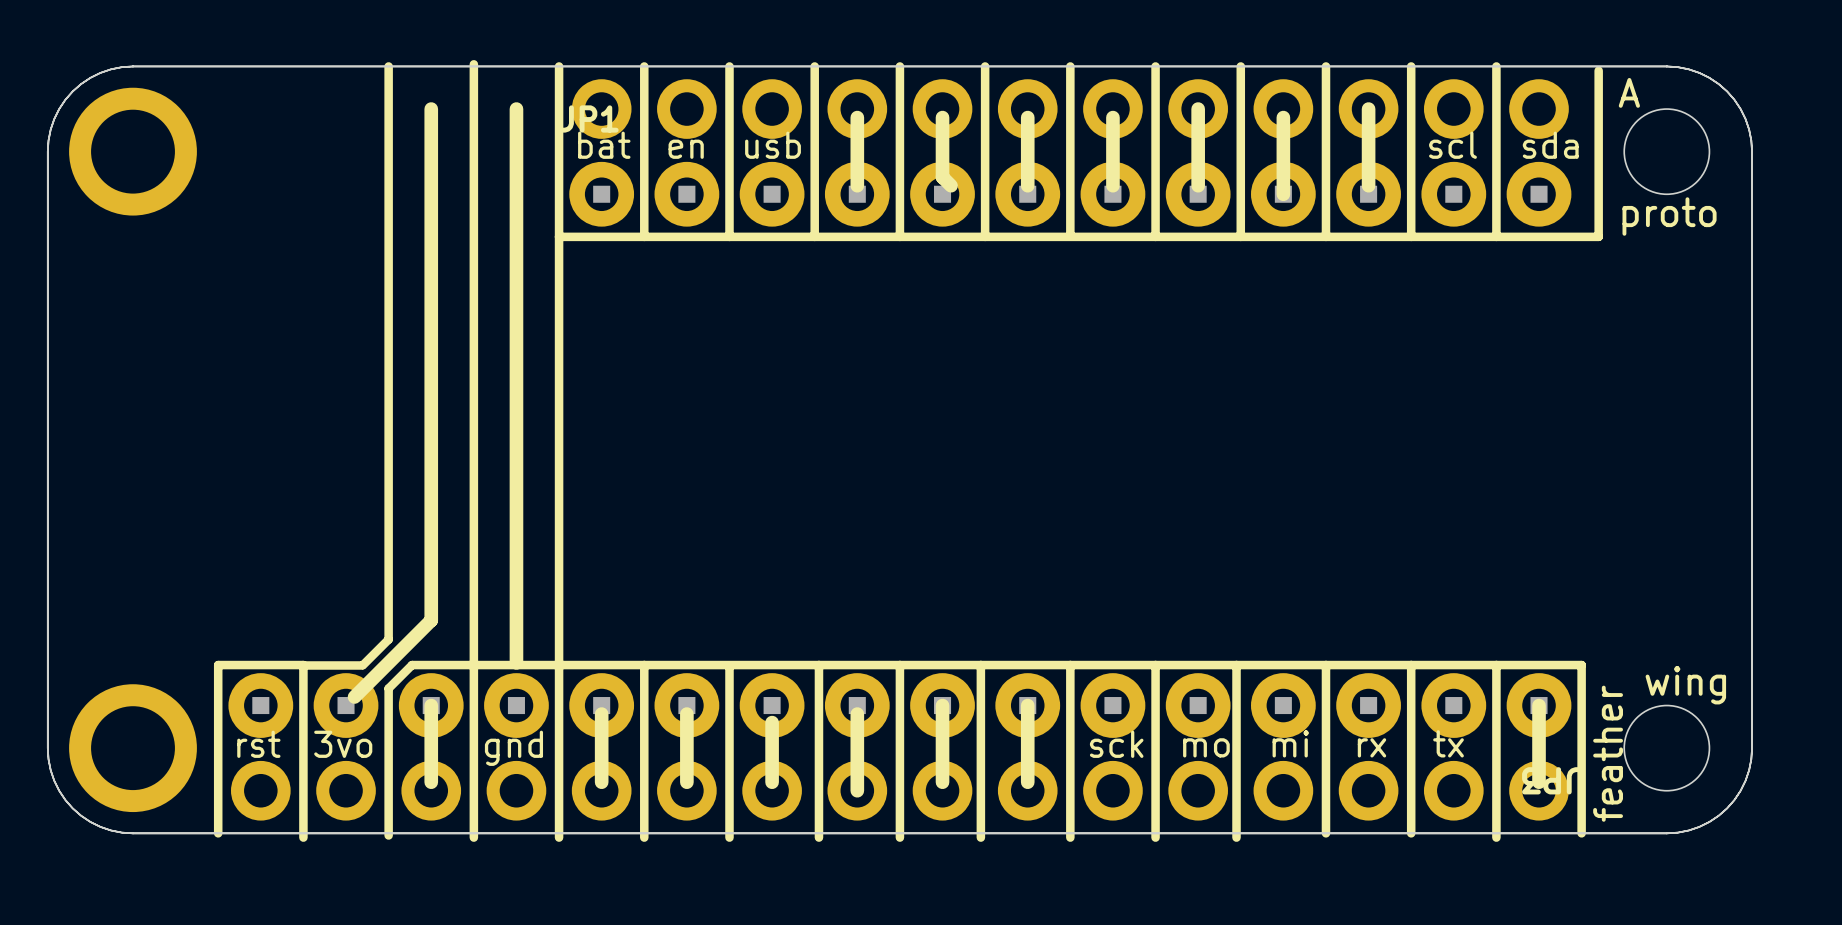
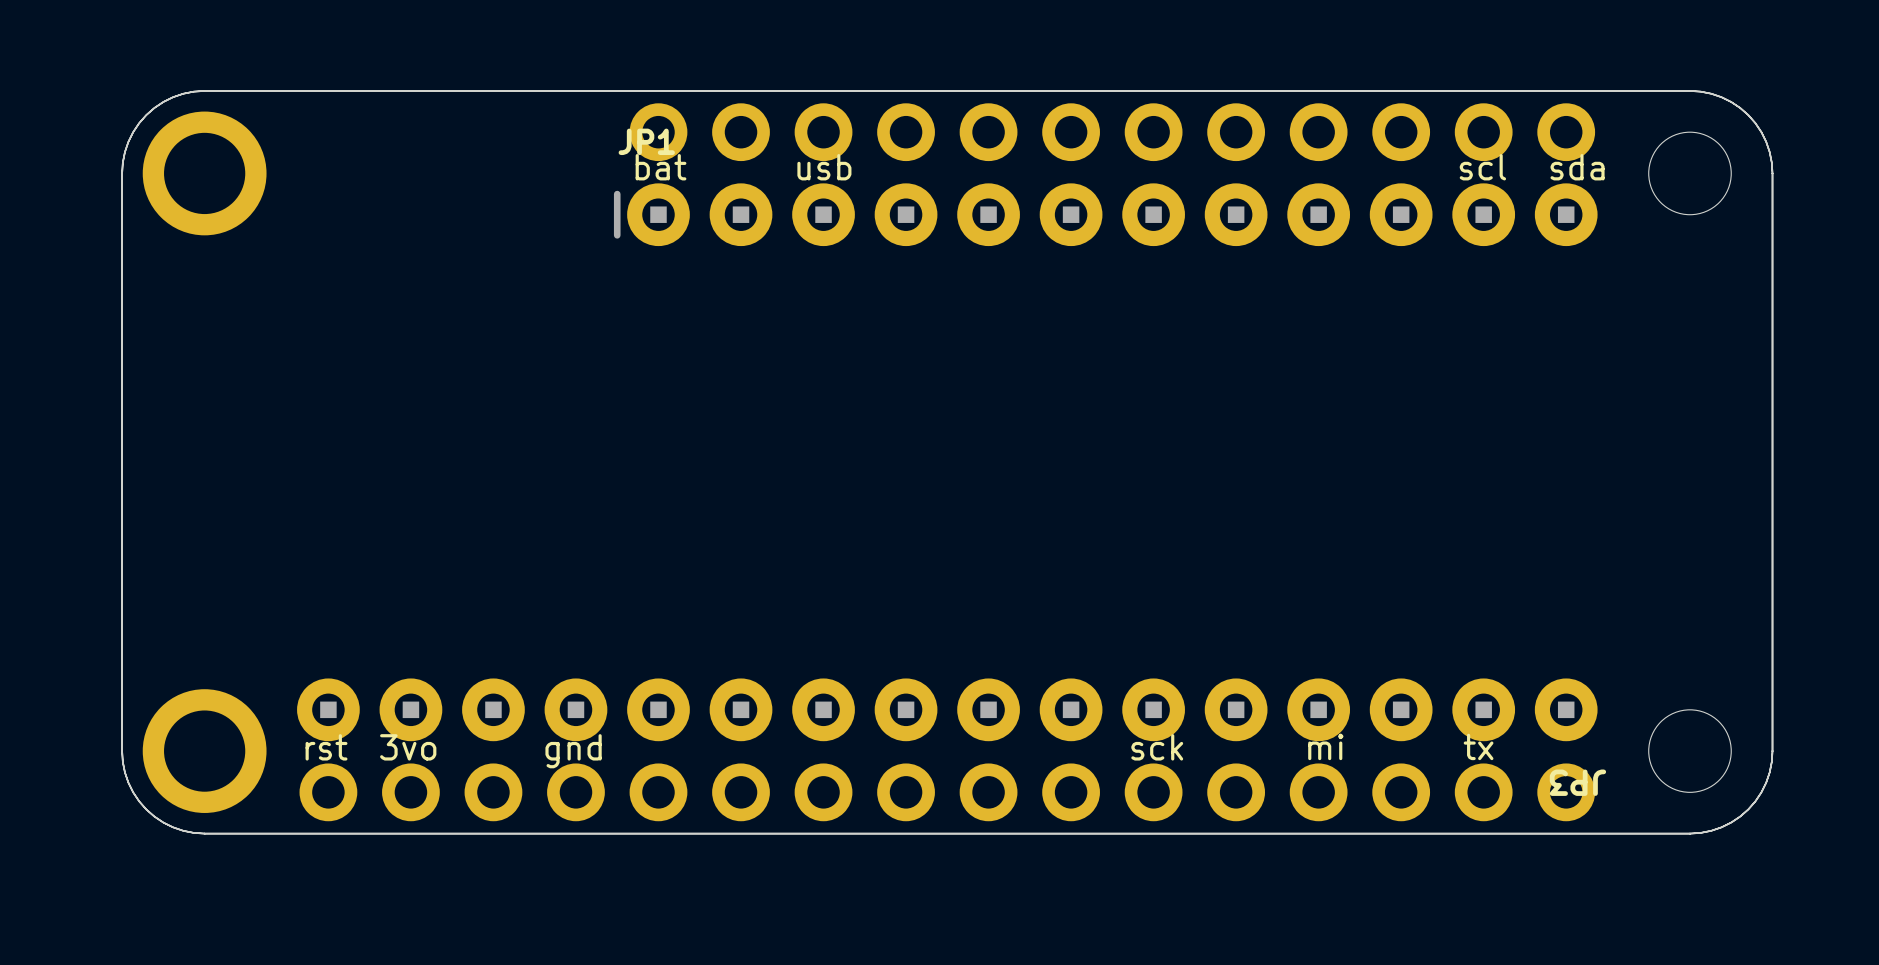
line: (473, 64) (473, 837) -> none
line: (388, 66) (388, 639) (363, 665) -> none
line: (559, 66) (559, 837) -> none
line: (644, 66) (644, 236) -> none
line: (729, 66) (729, 236) -> none
line: (814, 66) (814, 236) -> none
line: (899, 66) (899, 236) -> none
line: (985, 66) (985, 236) -> none
line: (1070, 66) (1070, 232) -> none
line: (1155, 66) (1155, 236) -> none
line: (1240, 66) (1240, 236) -> none
line: (1325, 66) (1325, 236) -> none
line: (1411, 66) (1411, 236) -> none
line: (1496, 66) (1496, 236) -> none
line: (1598, 70) (1598, 236) (559, 236) -> none
text: A (1629, 92) -> none
line: (431, 109) (431, 620) (354, 697) -> none
line: (516, 109) (516, 662) -> none
line: (1198, 109) (1198, 185) -> none
line: (1368, 109) (1368, 185) -> none
line: (857, 117) (857, 185) -> none
line: (942, 117) (942, 177) (951, 185) -> none
line: (1027, 117) (1027, 185) -> none
line: (1112, 117) (1112, 185) -> none
line: (1283, 117) (1283, 194) -> none
text: en (686, 149) -> none
text: proto (1669, 216) -> none
line: (302, 665) (362, 665) -> none
line: (644, 665) (644, 837) -> none
line: (818, 665) (818, 837) -> none
line: (899, 665) (899, 837) -> none
line: (980, 665) (980, 837) -> none
line: (1070, 665) (1070, 837) -> none
line: (1155, 665) (1155, 837) -> none
line: (1236, 665) (1236, 837) -> none
line: (1325, 665) (1325, 833) -> none
line: (1411, 665) (1411, 833) -> none
line: (1496, 665) (1496, 837) -> none
line: (729, 669) (729, 837) -> none
text: wing (1685, 685) -> none
line: (431, 705) (431, 782) -> none
line: (942, 705) (942, 782) -> none
line: (1027, 705) (1027, 782) -> none
line: (1539, 705) (1539, 782) -> none
line: (601, 714) (601, 782) -> none
line: (686, 714) (686, 782) -> none
line: (857, 714) (857, 790) -> none
line: (772, 722) (772, 782) -> none
text: mo (1206, 747) -> none
text: rx (1371, 747) -> none
text: feather (1608, 753) -> none
line: (218, 833) (218, 665) (303, 665) (303, 837) -> none
line: (1581, 833) (1581, 665) (412, 665) (388, 688) (388, 835) -> none

